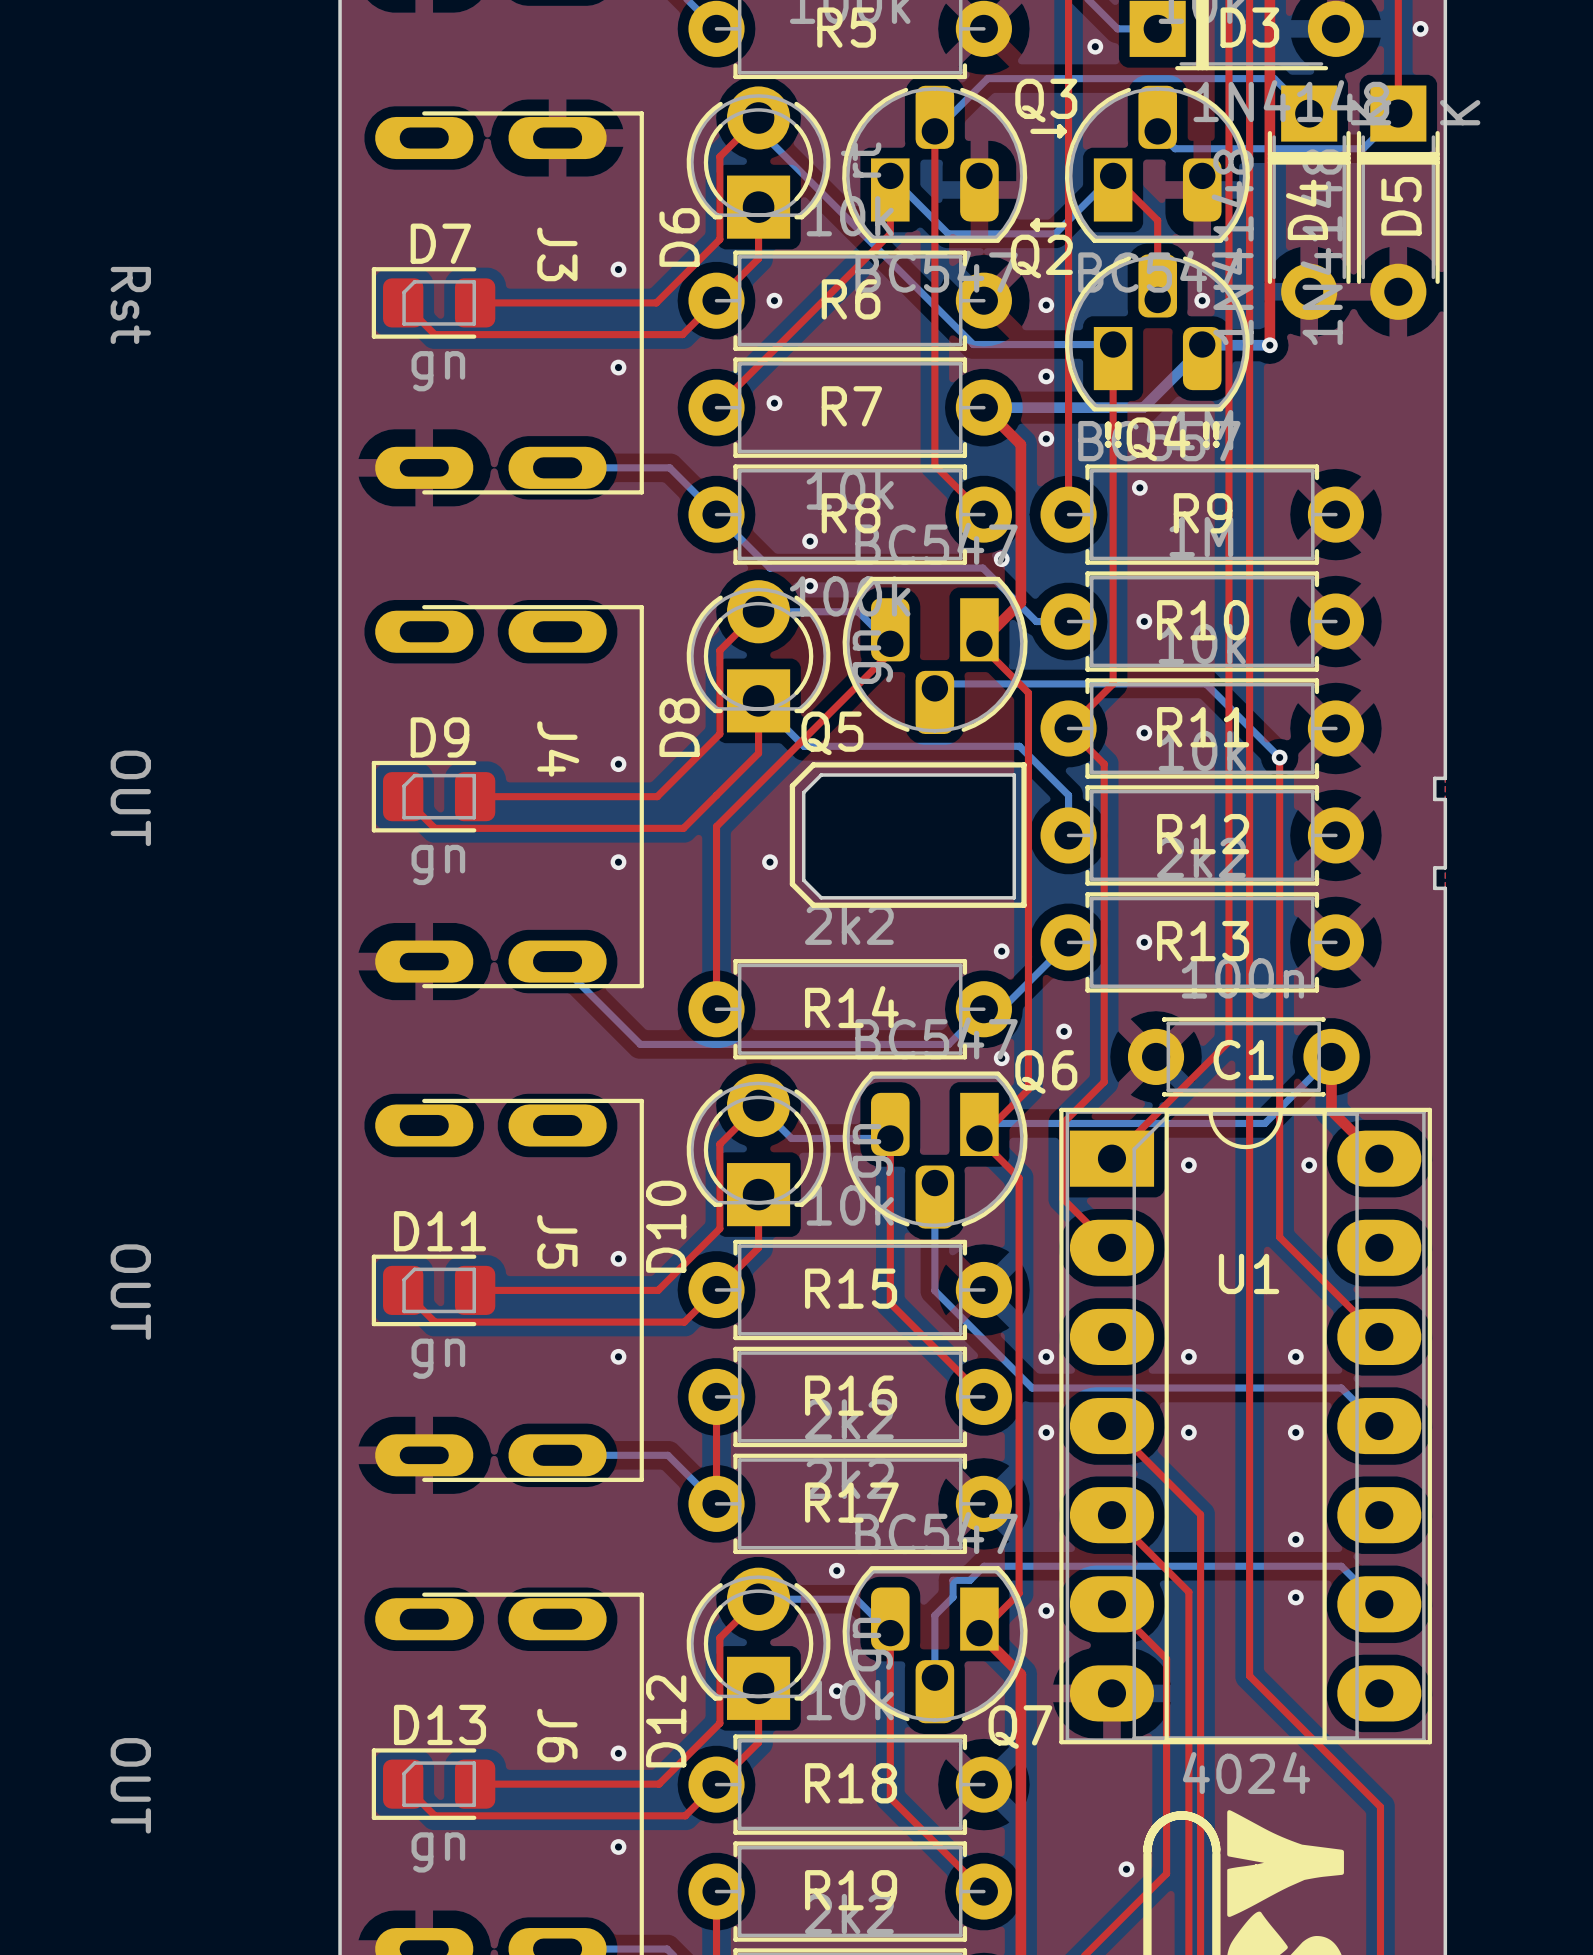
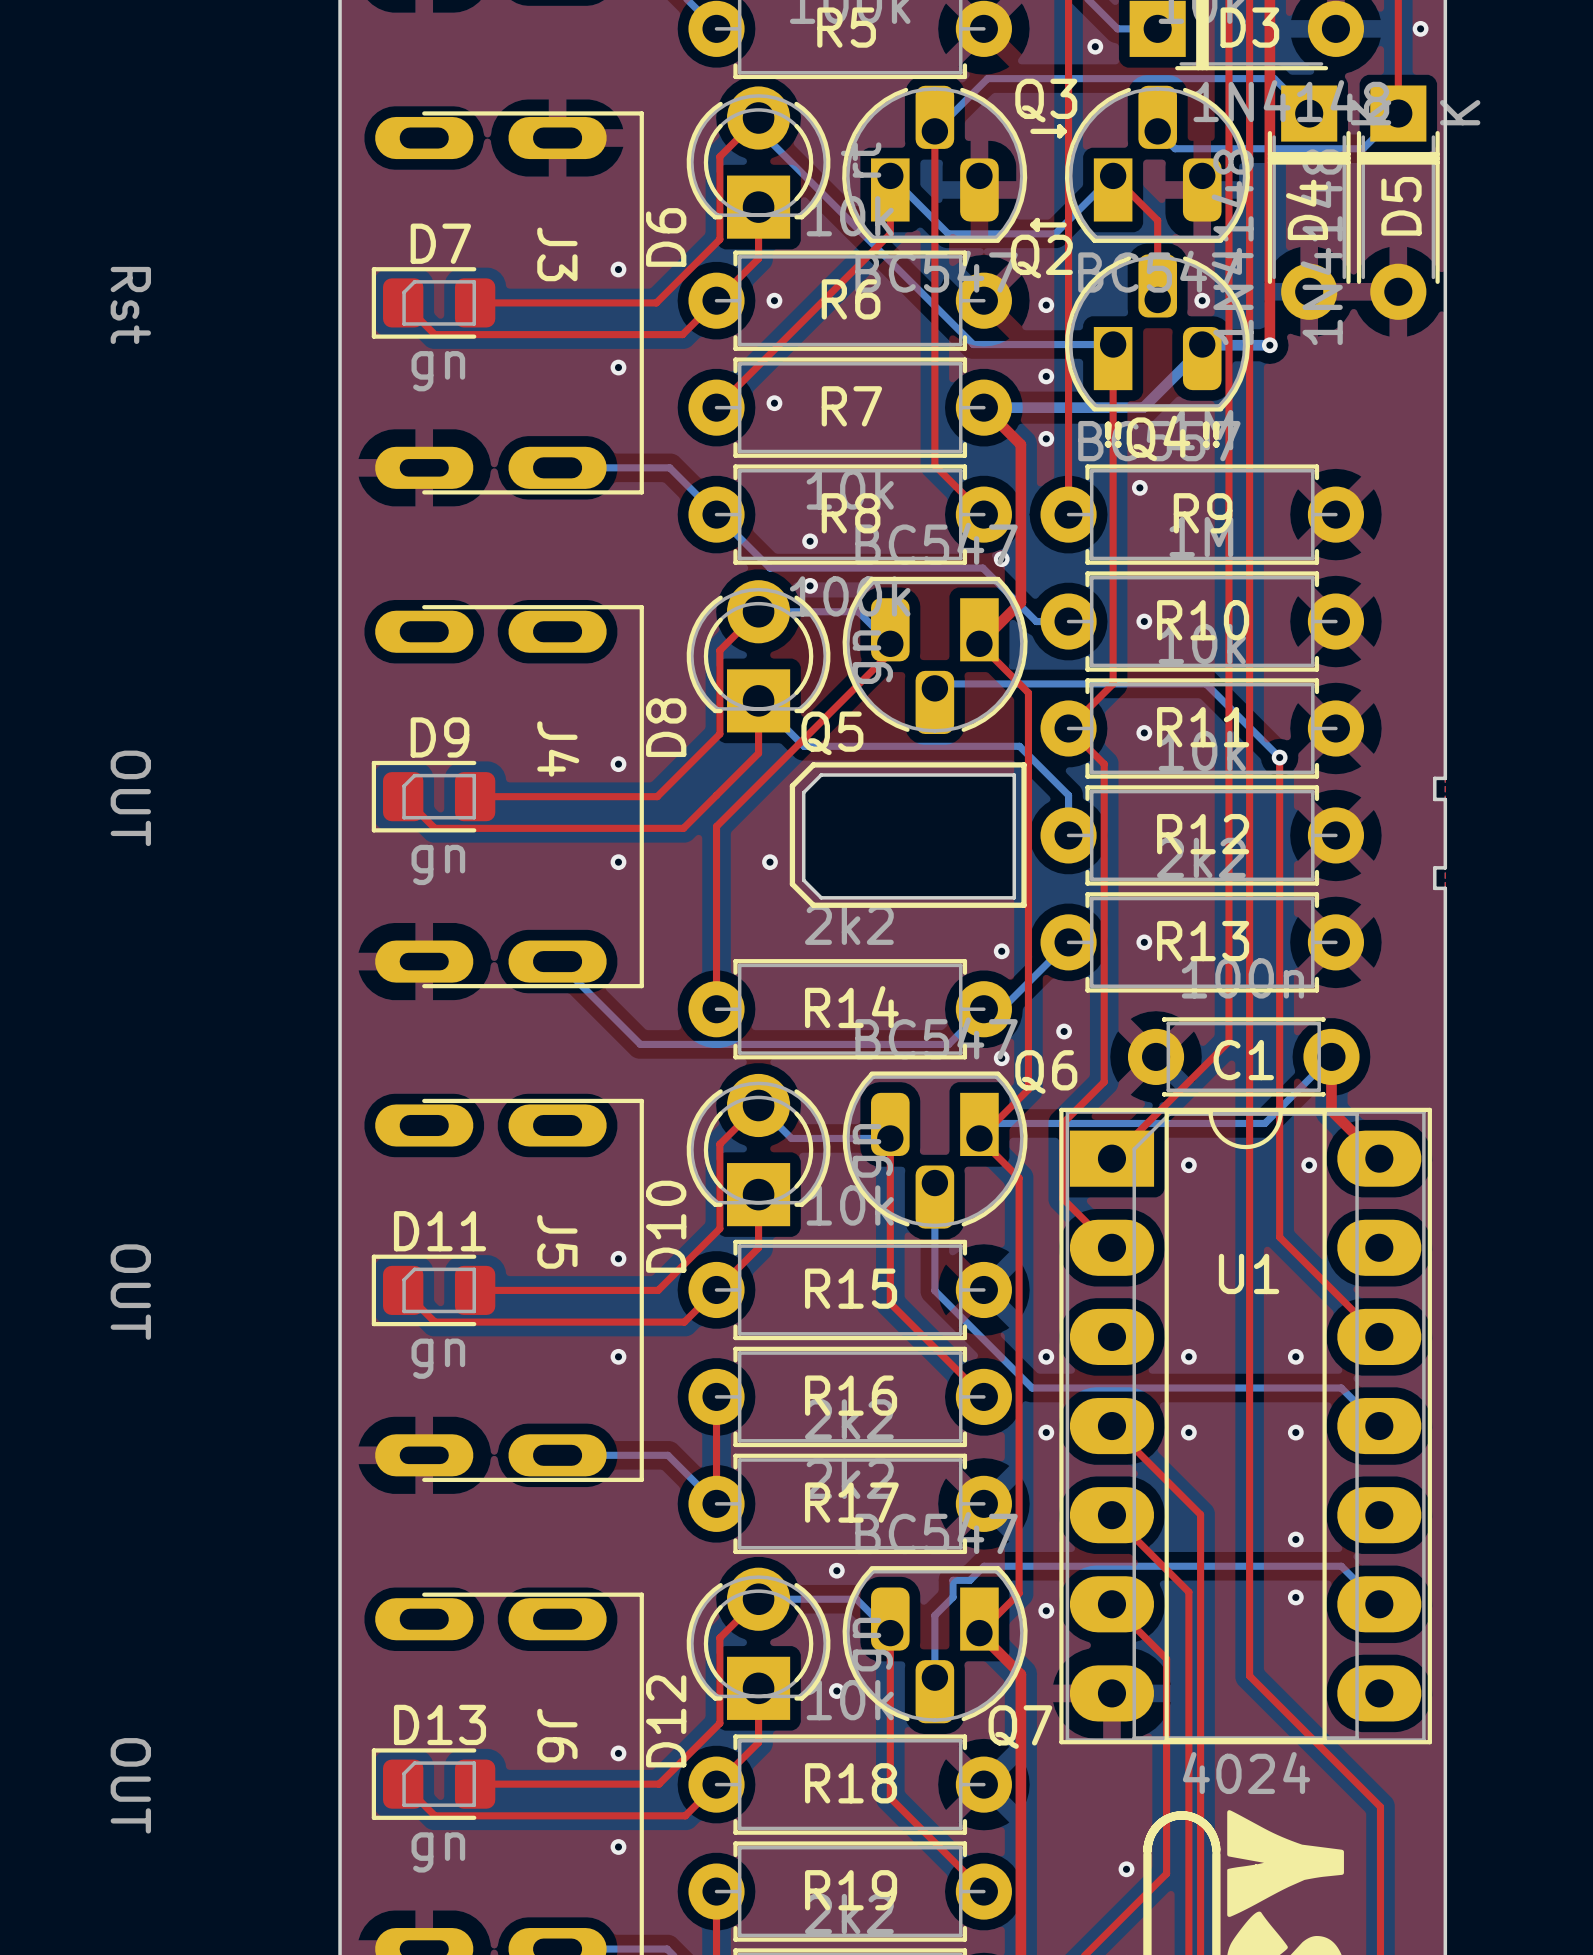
D6 name position: D6 (679, 237) -> D6 (666, 237)
D8 name position: D8 (679, 727) -> D8 (666, 727)

